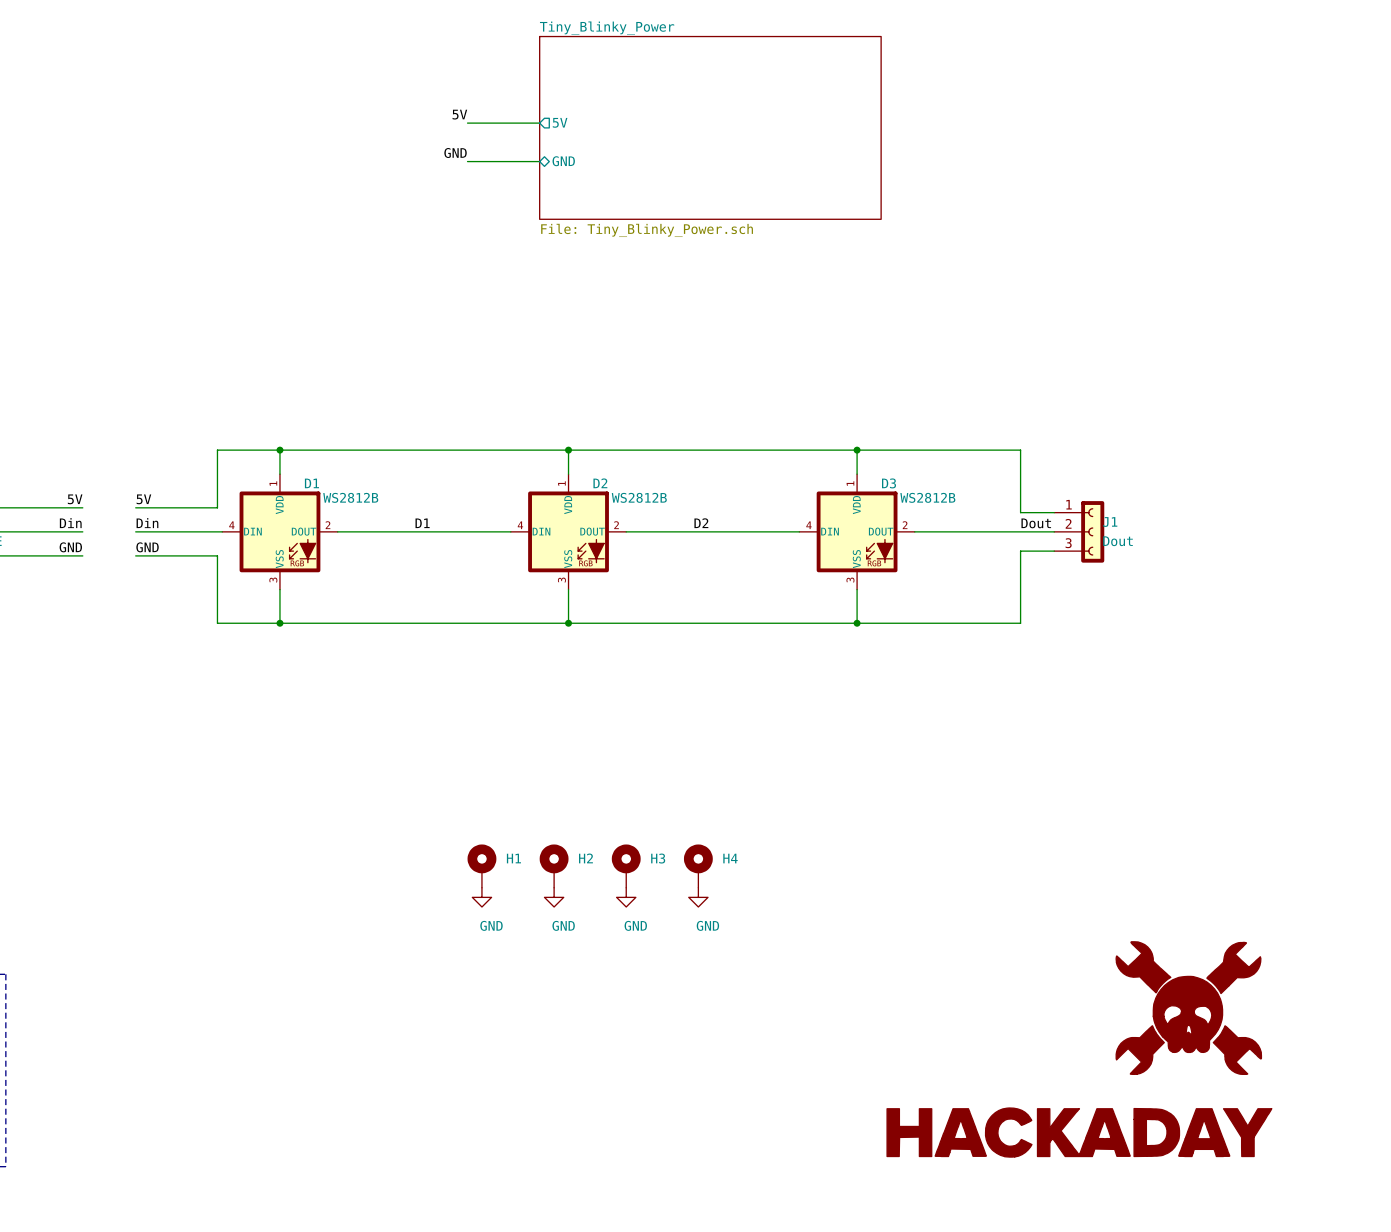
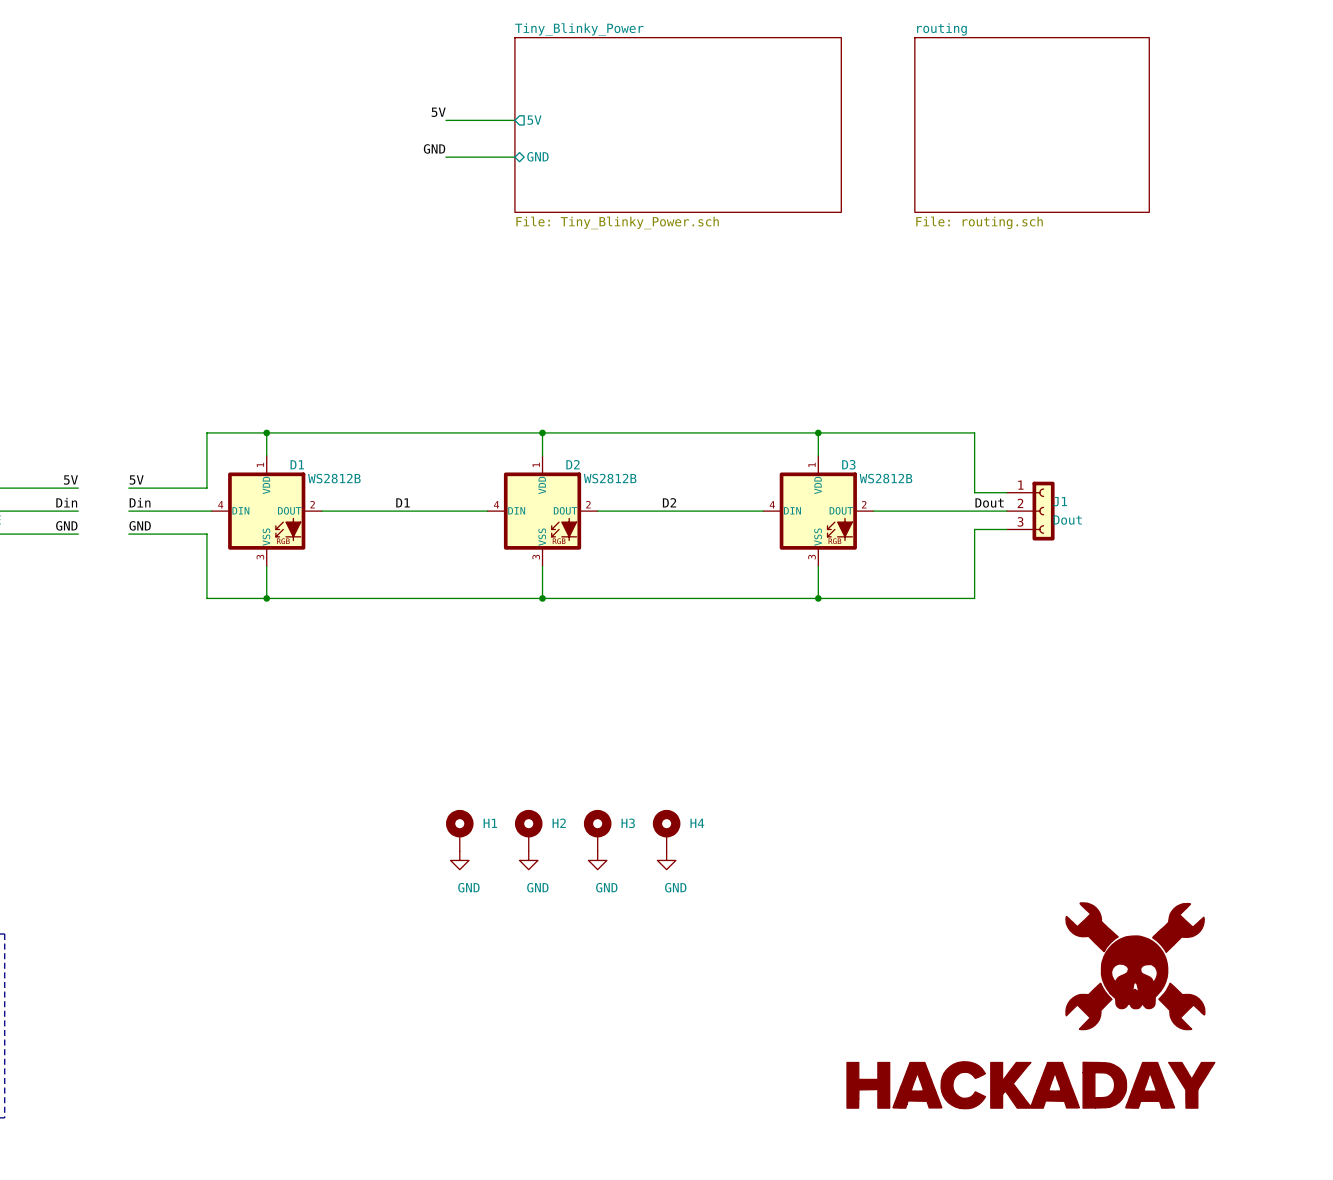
sheet routing: none -> File: routing.sch (1032, 124)

